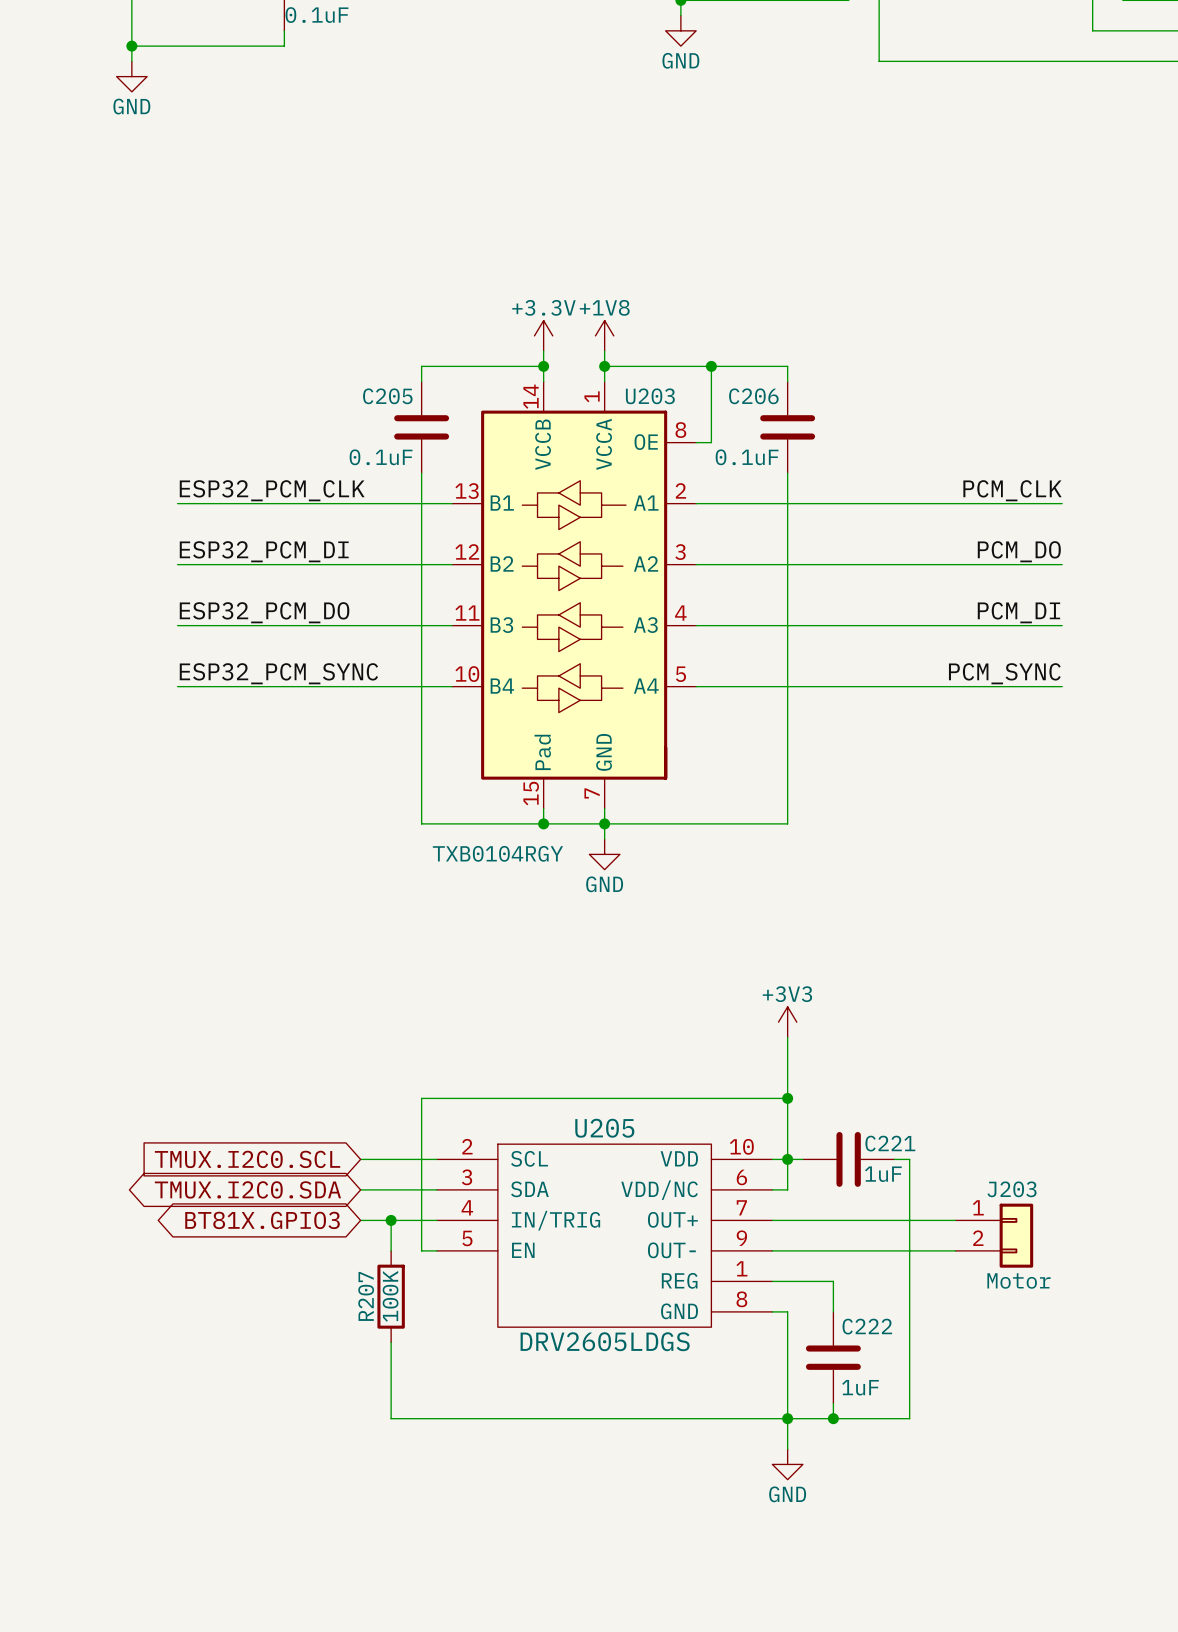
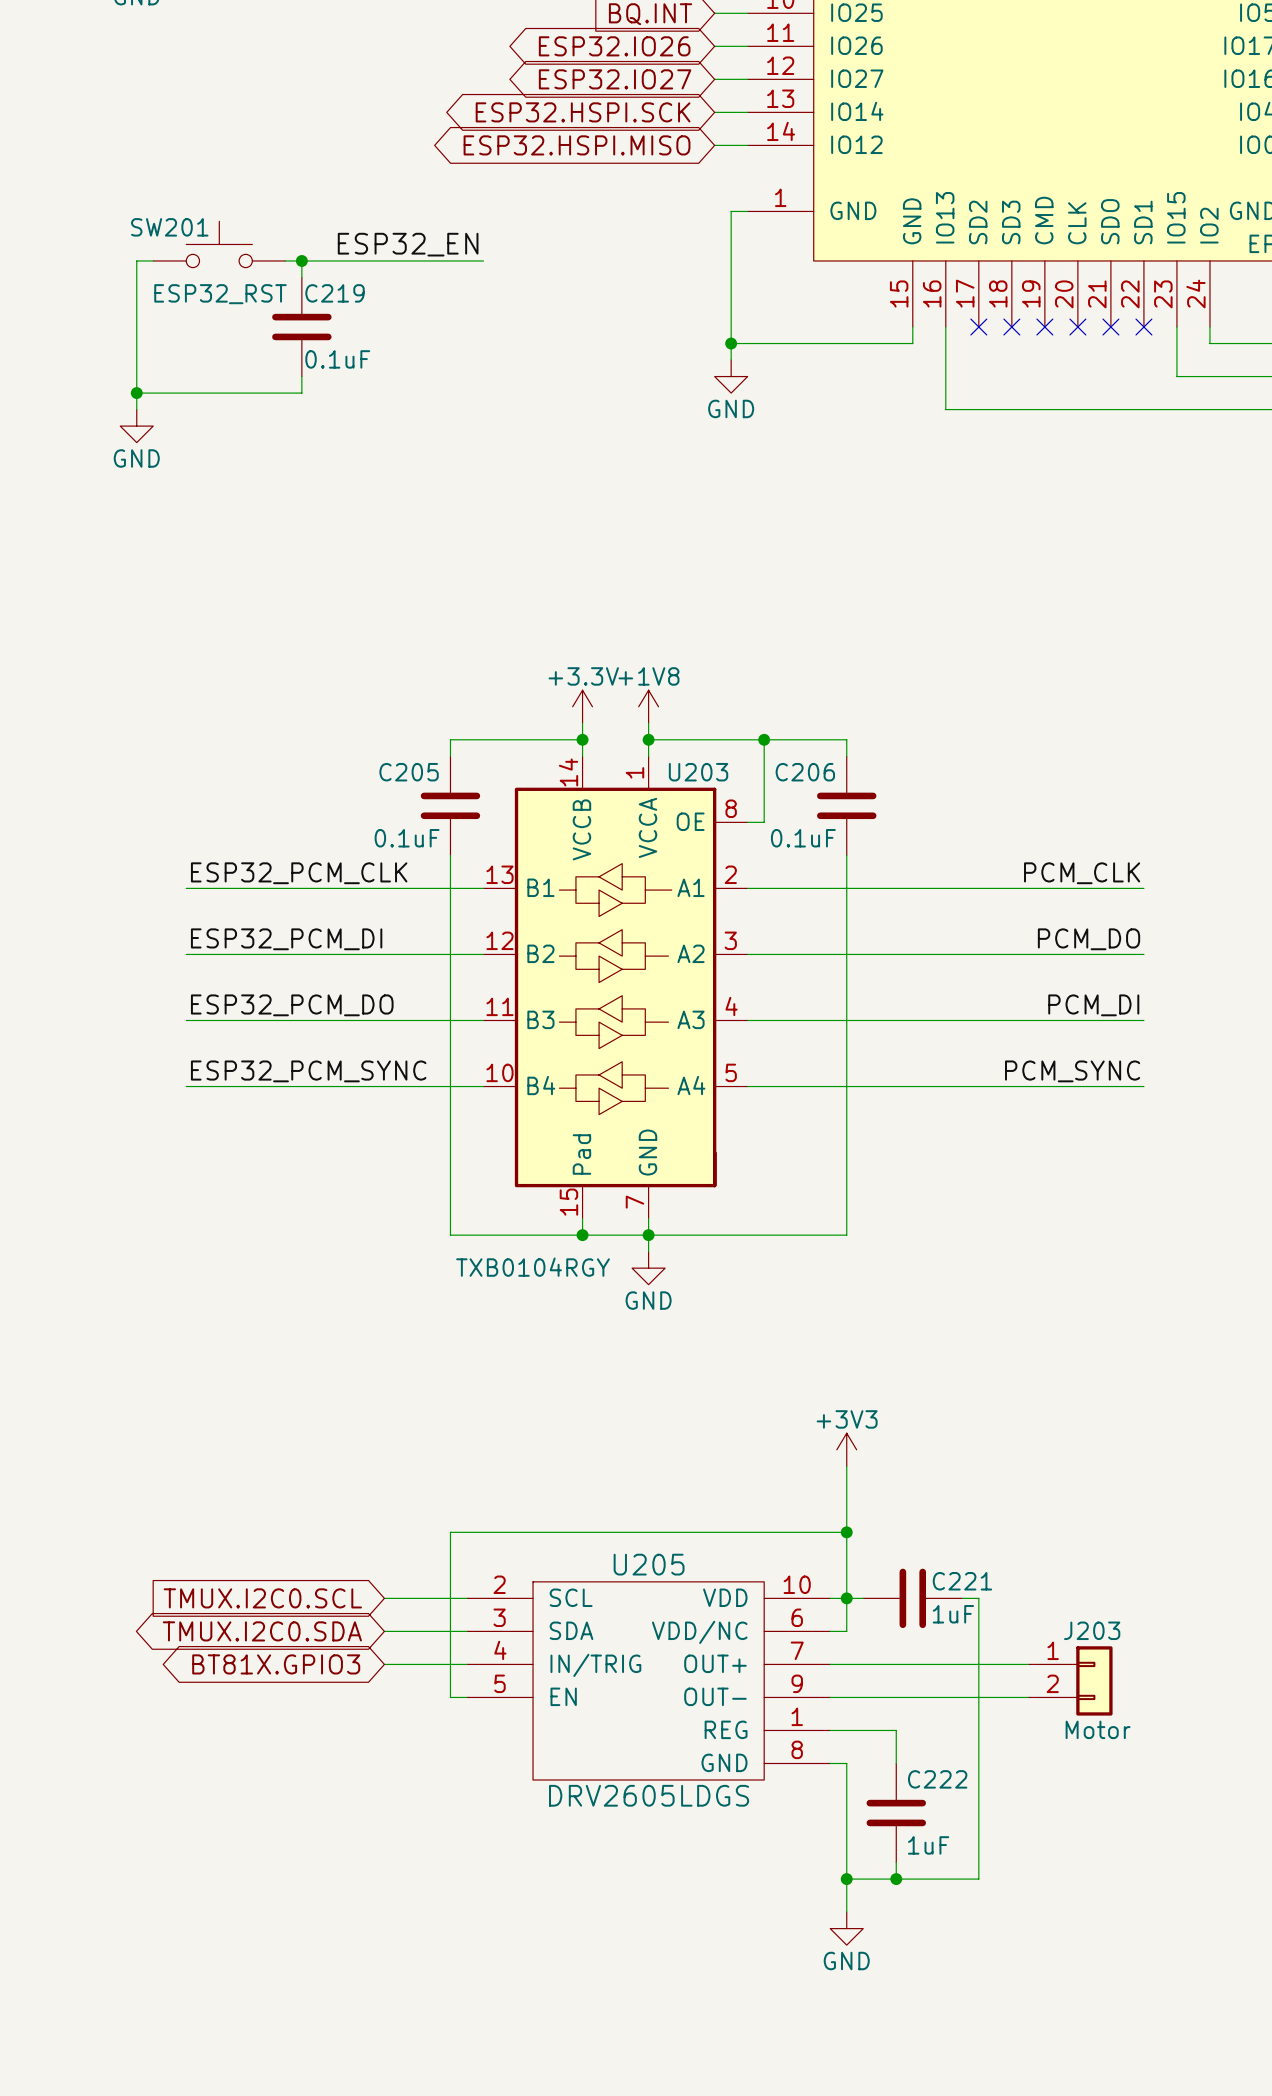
wire: (391, 1220) (391, 1250) -> none
junction: (391, 1220) -> none
R207: 100K (391, 1296) -> none
wire: (391, 1342) (391, 1418) (787, 1418) -> none

